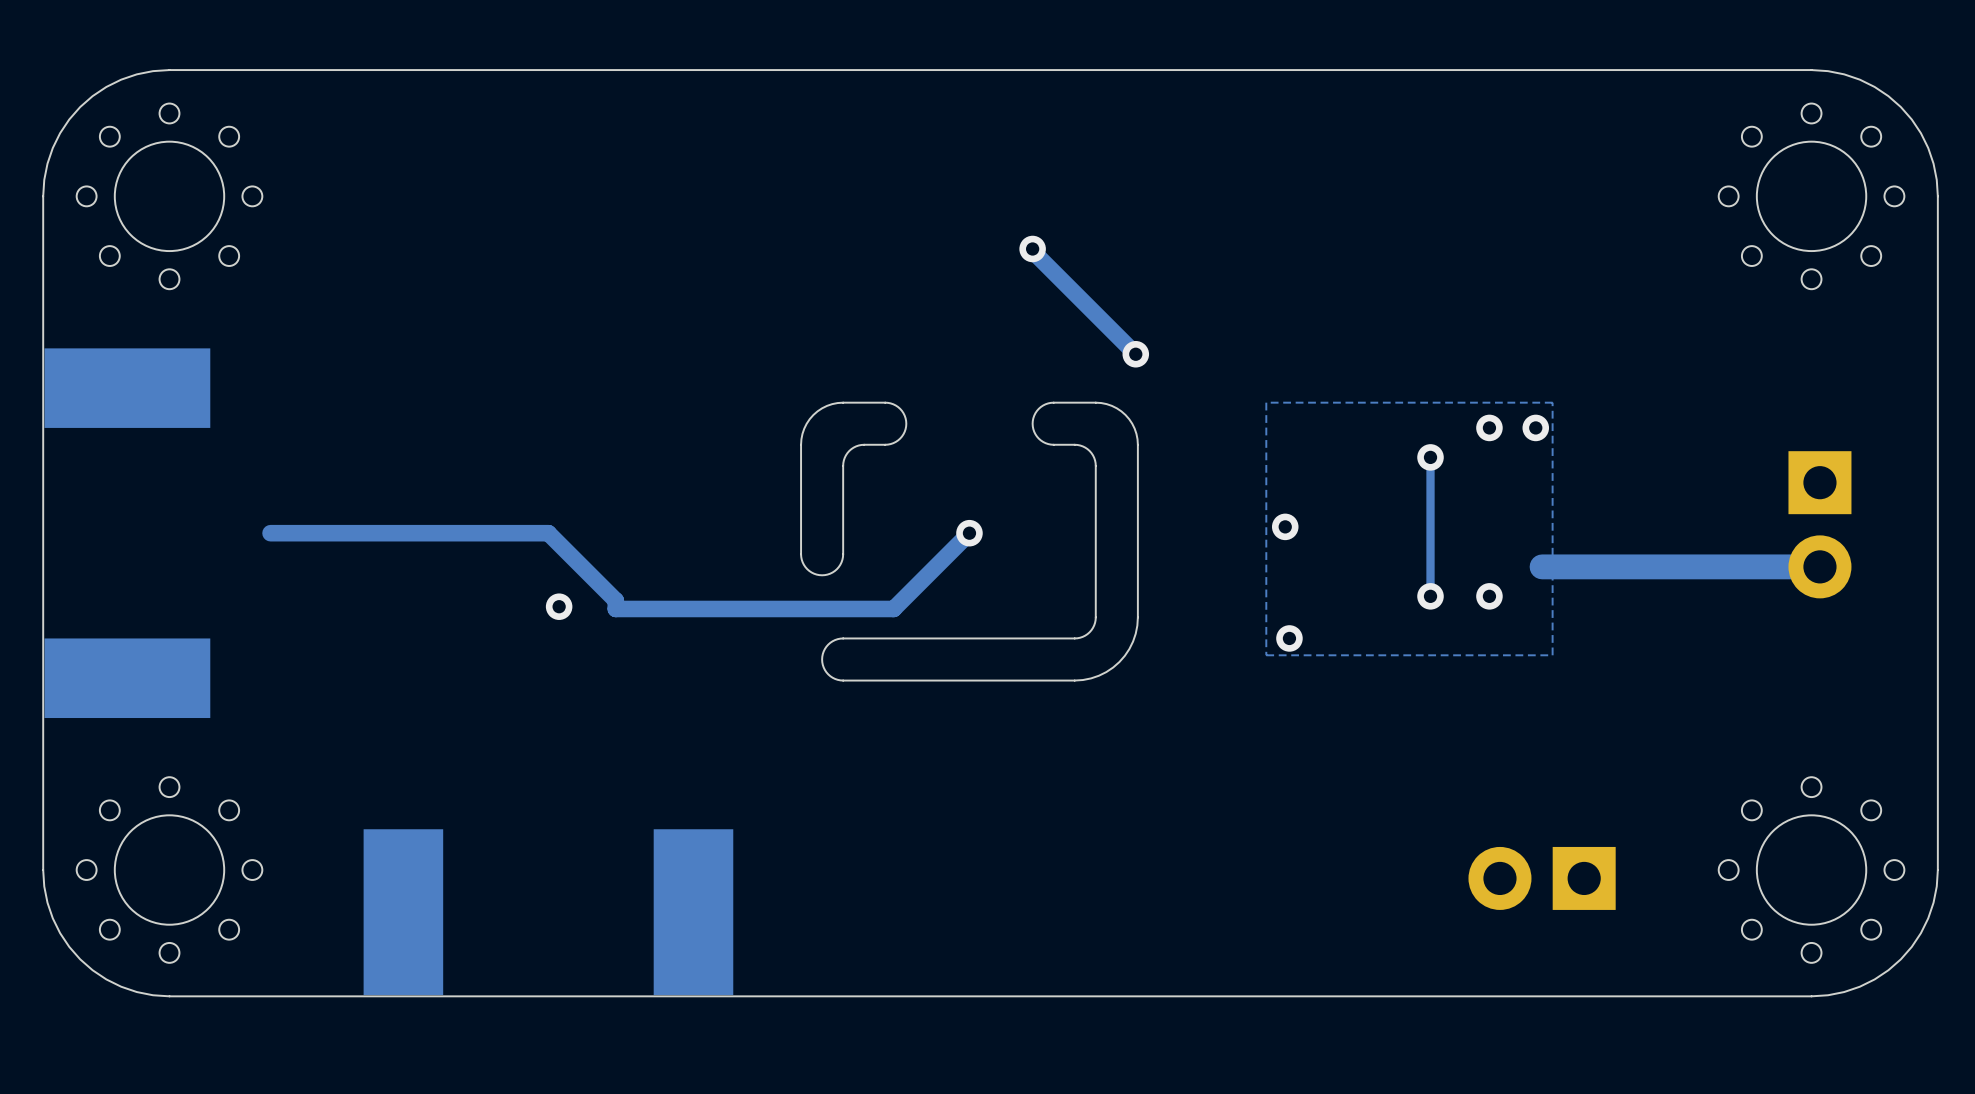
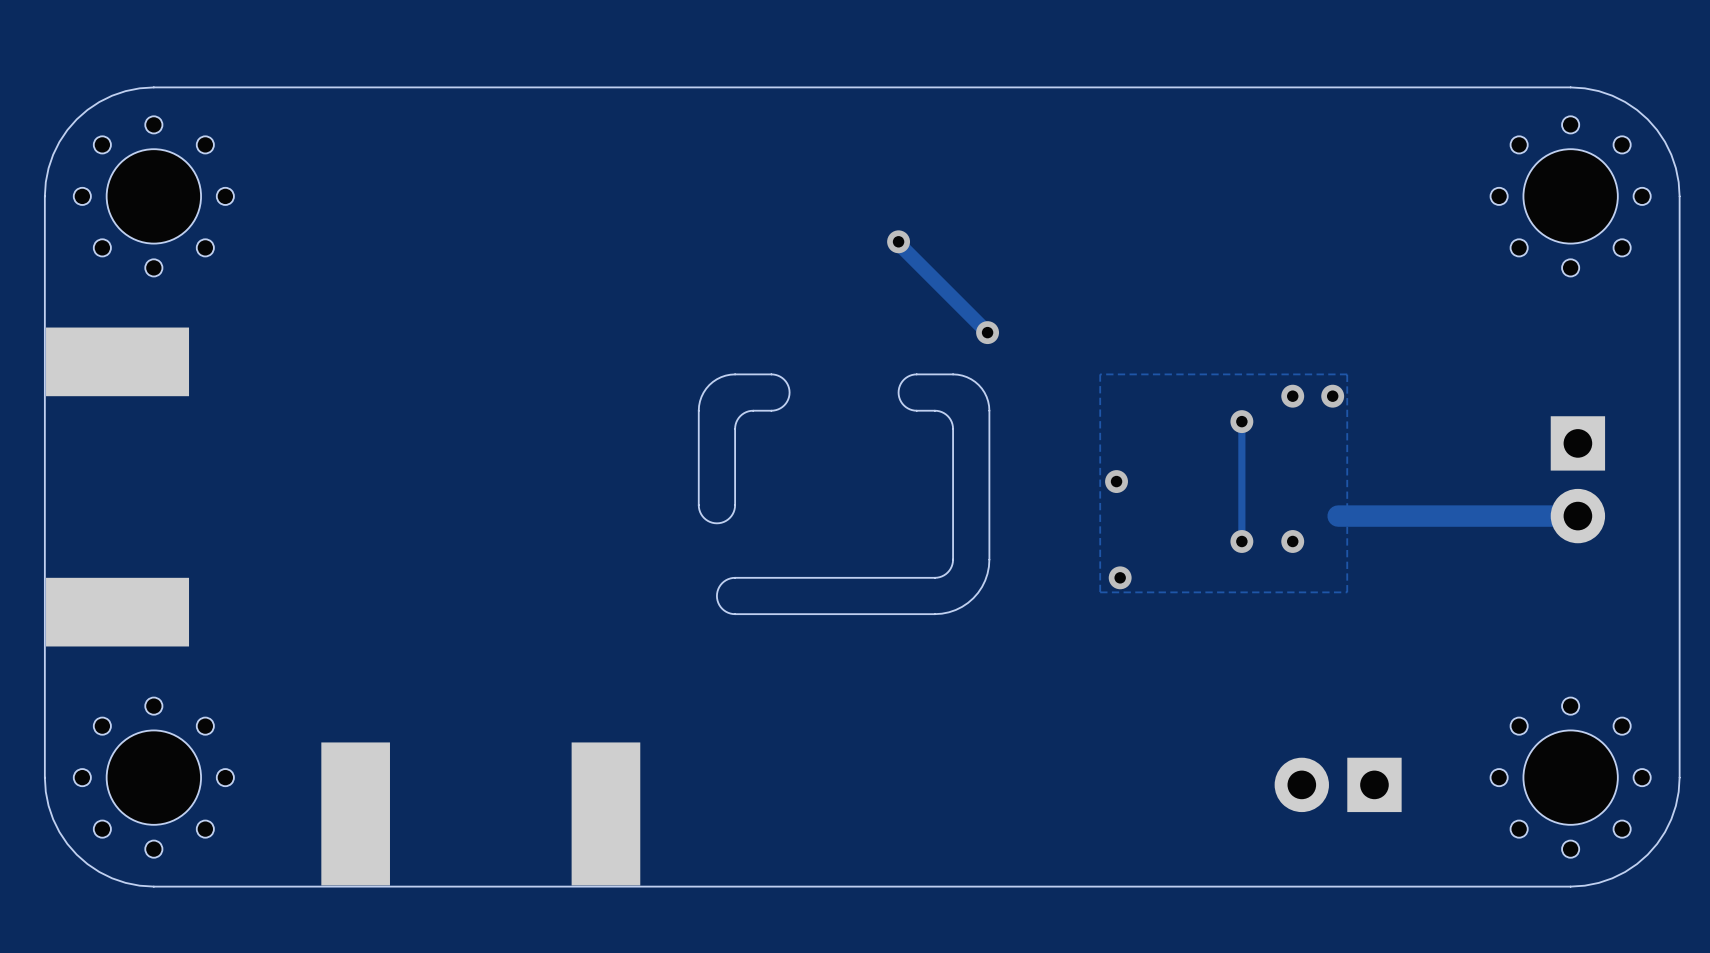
track: (969, 533) (893, 608) (615, 608) (615, 600) (548, 533) (270, 533) -> none
via: (969, 533) -> none
via: (559, 606) -> none

